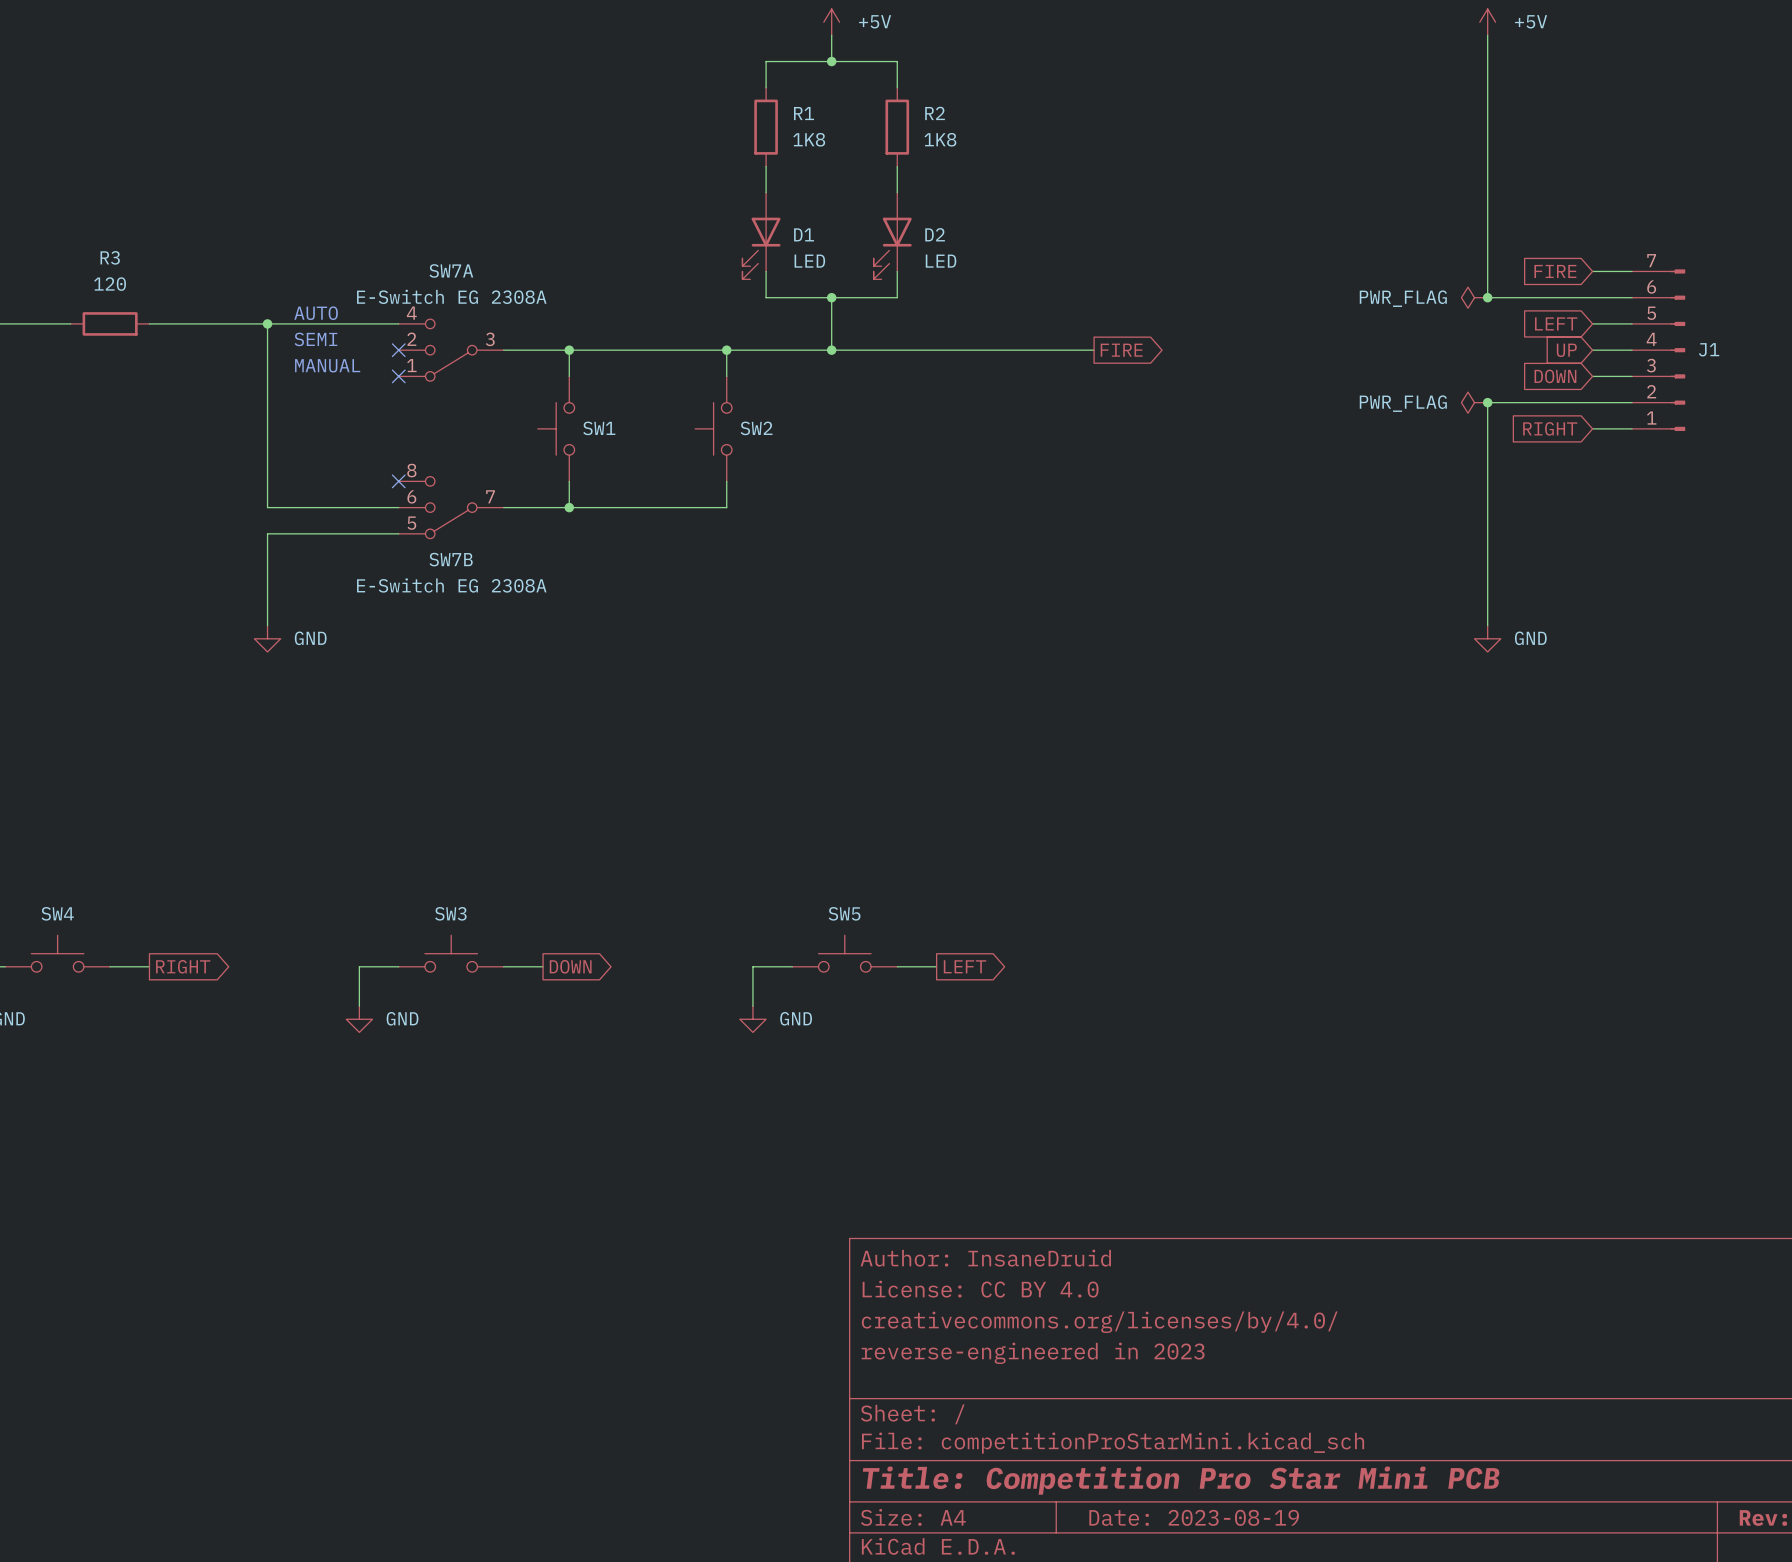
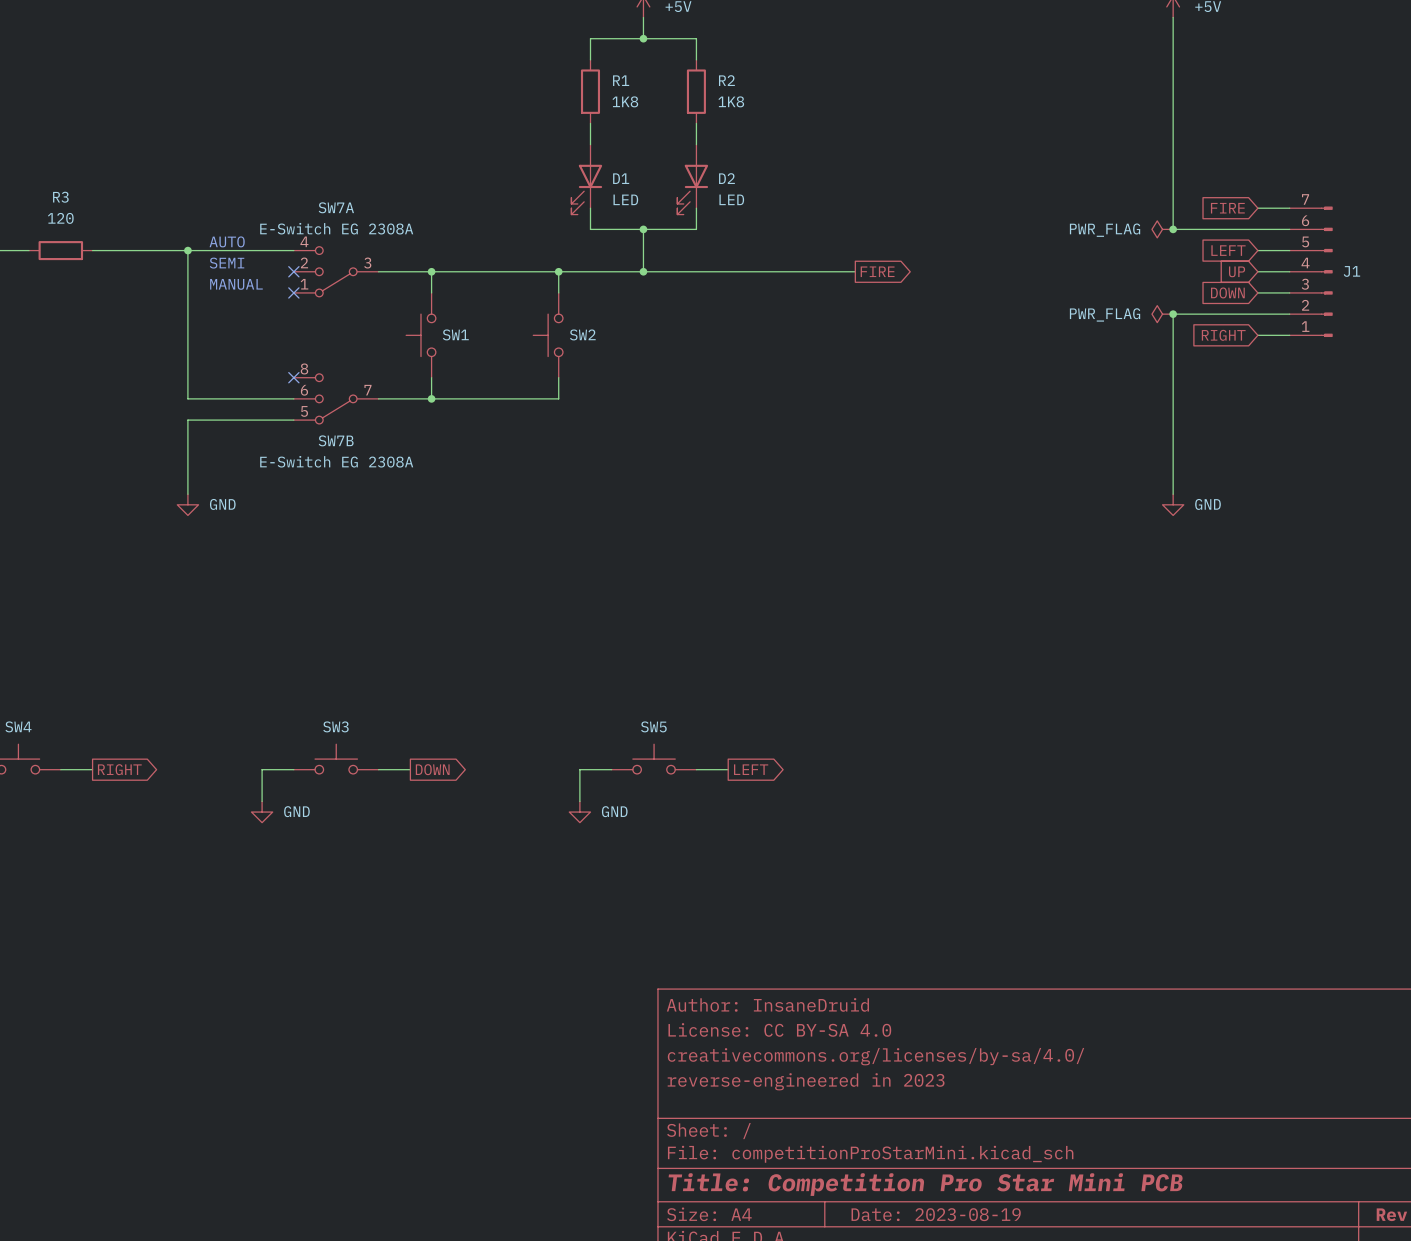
title block: License: CC BY 4.0 (980, 1289) -> License: CC BY-SA 4.0 (779, 1029)
title block: creativecommons.org/licenses/by/4.0/ (1099, 1322) -> creativecommons.org/licenses/by-sa/4.0/ (876, 1056)

